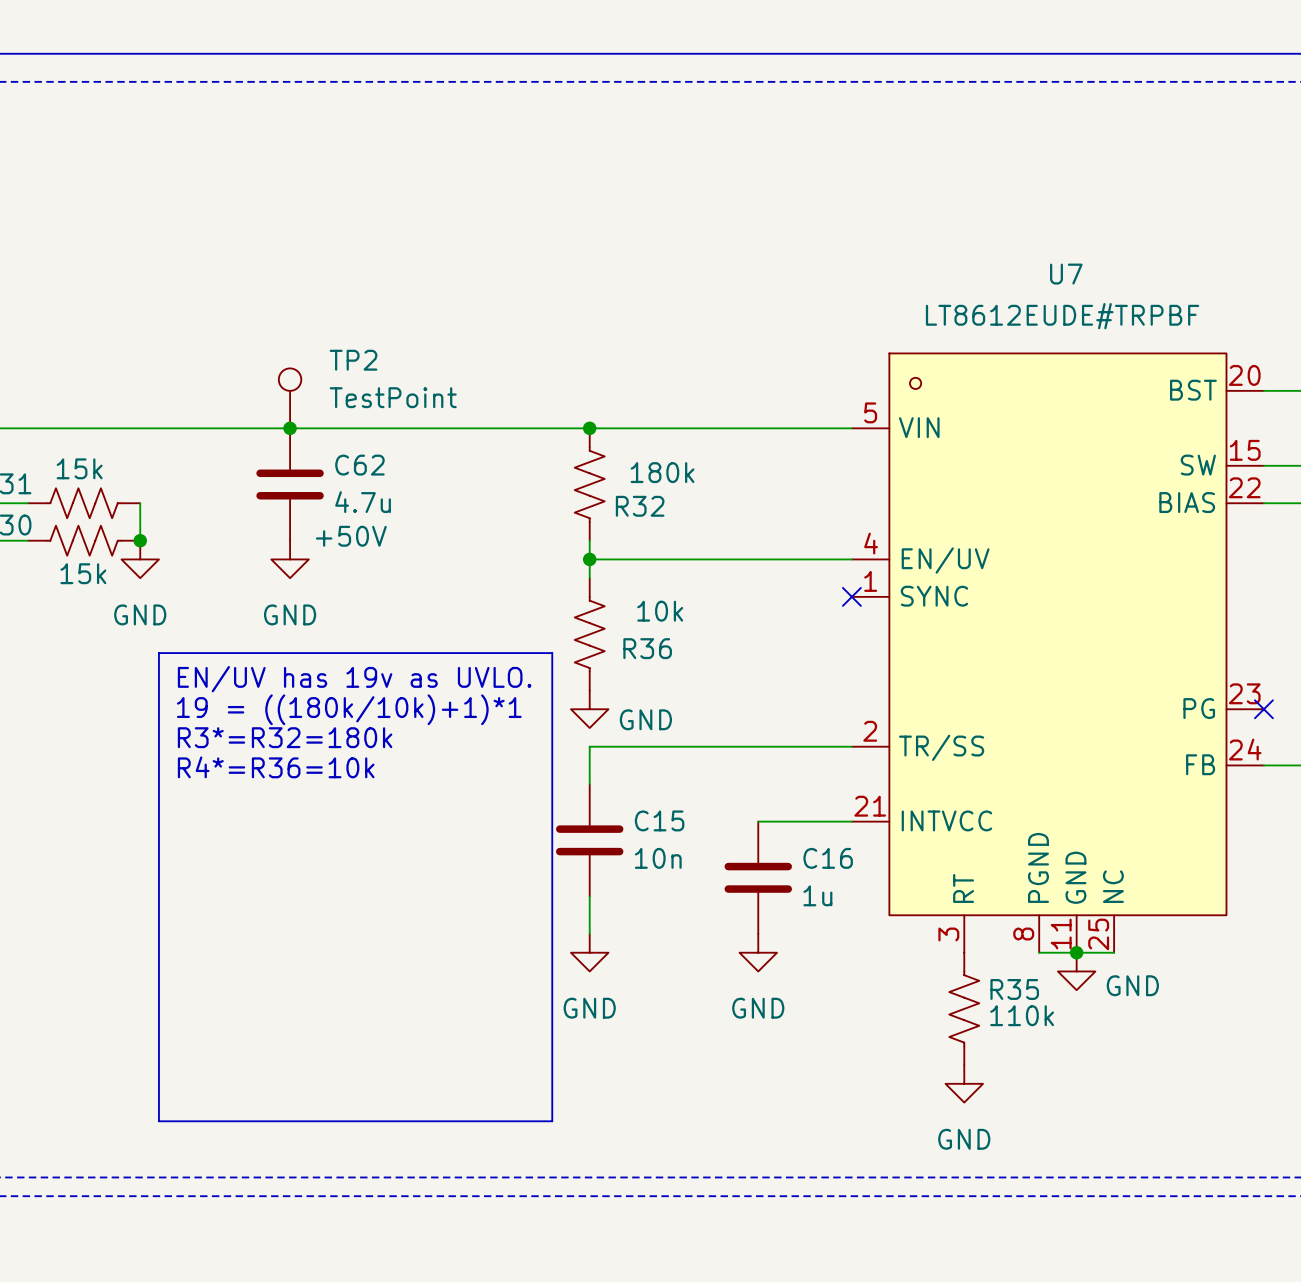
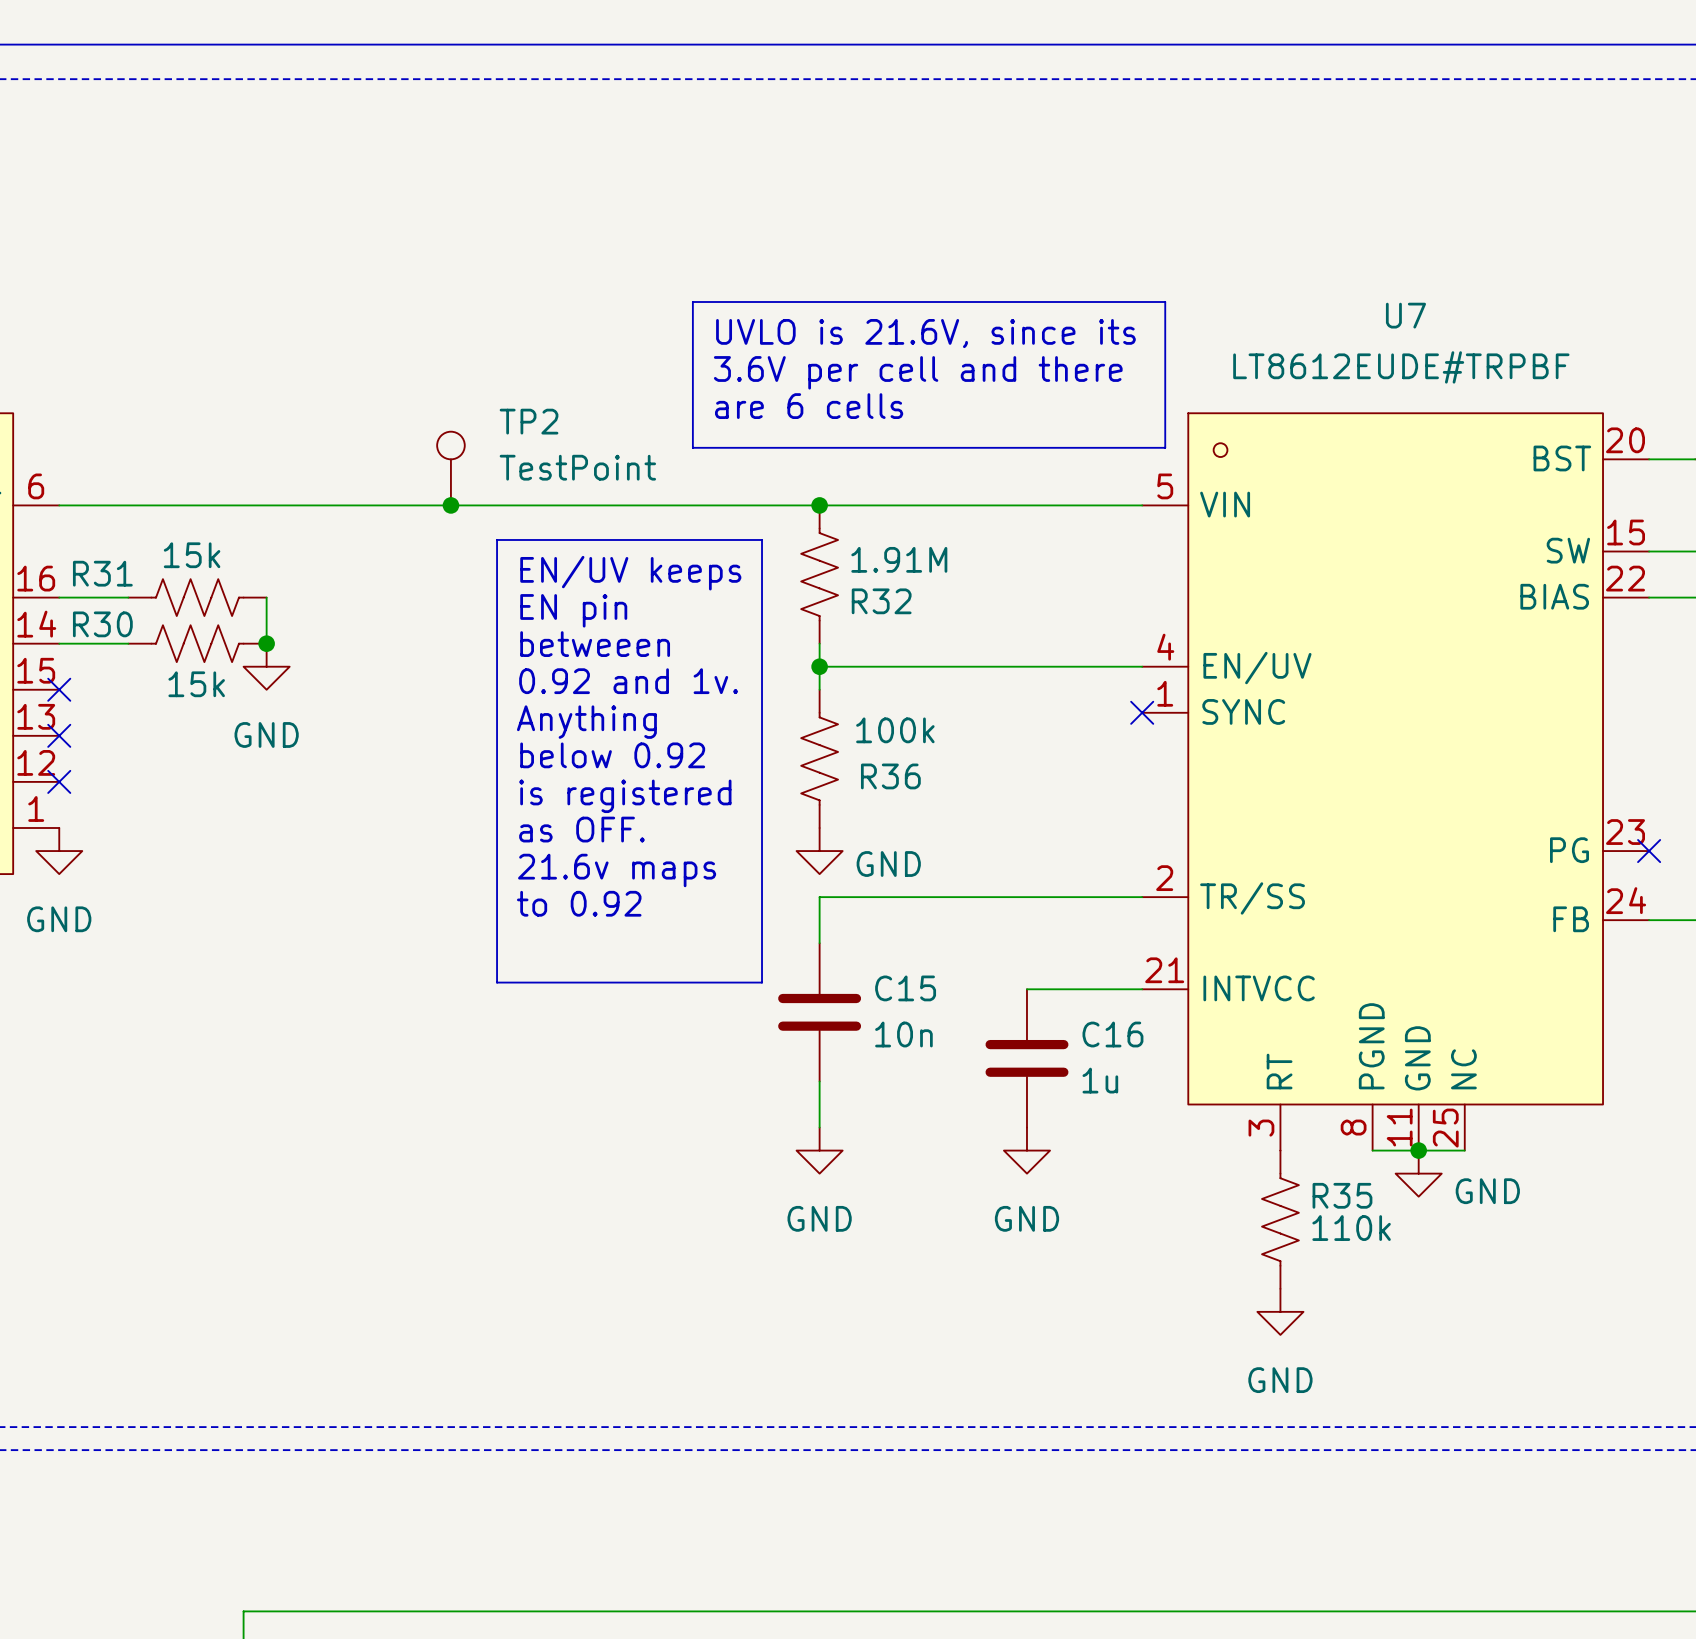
line: none -> (692, 301) (1165, 301) (1165, 447) (692, 447) (692, 301)
text: none -> UVLO is 21.6V, since its (925, 333)
text: none -> 3.6V per cell and there (918, 372)
text: none -> are 6 cells (809, 406)
line: none -> (497, 539) (762, 539) (762, 982) (497, 982) (497, 539)
R32 value: 180k (662, 472) -> 1.91M (899, 559)
text: none -> EN/UV keeps (630, 573)
C62: 4.7u (290, 484) -> none
text: none -> EN pin (573, 610)
text: none -> betweeen (595, 644)
power symbol: GND (290, 559) -> none
text: none -> 0.92 and 1v. (628, 681)
text: none -> Anything (586, 722)
R36 value: 10k (660, 611) -> 100k (895, 730)
text: none -> below 0.92 (612, 755)
line: (158, 653) (552, 653) (552, 1121) (158, 1121) (158, 653) -> none
text: none -> is registered (625, 796)
text: EN/UV has 19v as UVLO. (354, 679) -> none
text: none -> as OFF. (581, 829)
text: 19 = ((180k/10k)+1)*1 (349, 709) -> none
text: none -> 21.6v maps (617, 870)
text: R3*=R32=180k (285, 737) -> none
text: none -> to 0.92 (579, 903)
text: R4*=R36=10k (276, 767) -> none

